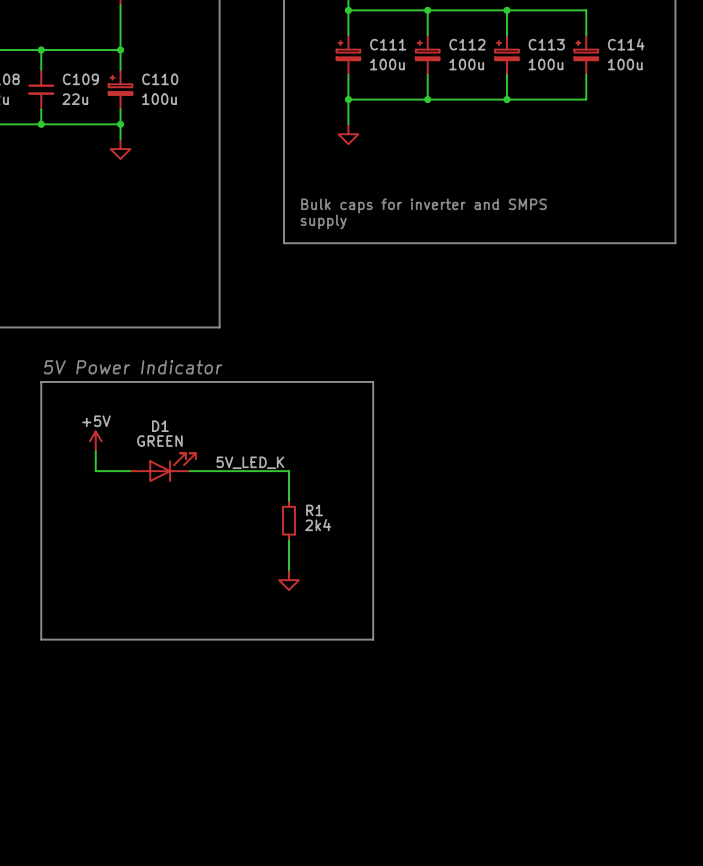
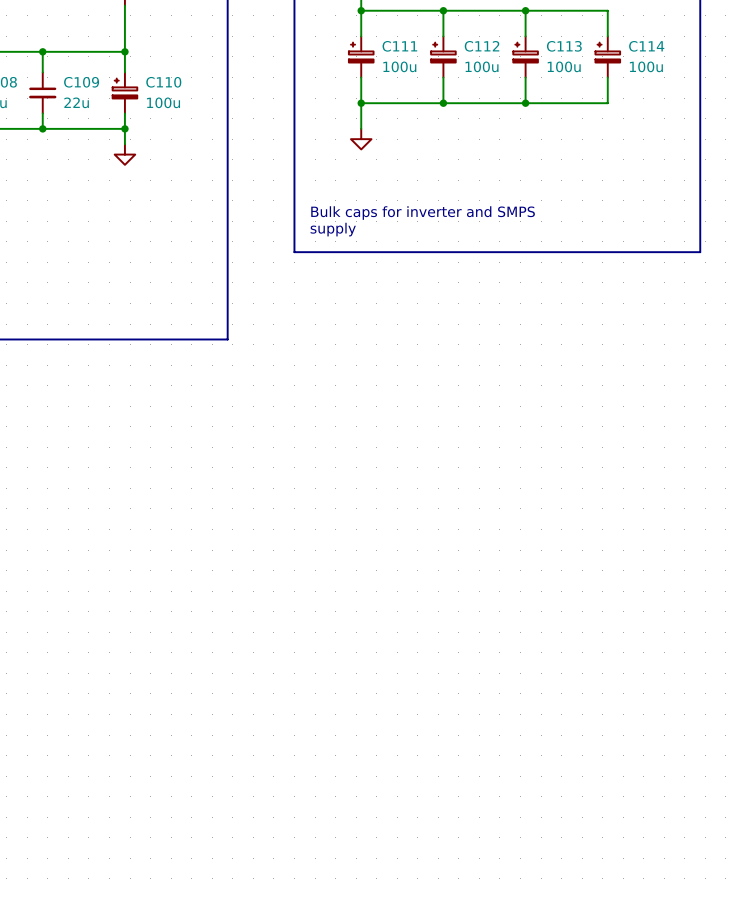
text: 5V Power Indicator (132, 367) -> none
line: (41, 381) (373, 381) (373, 639) (41, 639) (41, 381) -> none
power symbol: +5V (95, 441) -> none
wire: (95, 451) (95, 471) (130, 471) -> none
label: 5V_LED_K (250, 462) -> none
D1: GREEN (163, 467) -> none
wire: (189, 471) (288, 471) (288, 500) -> none
R1: 2k4 (288, 520) -> none
wire: (288, 540) (288, 570) -> none
power symbol: (288, 580) -> none

